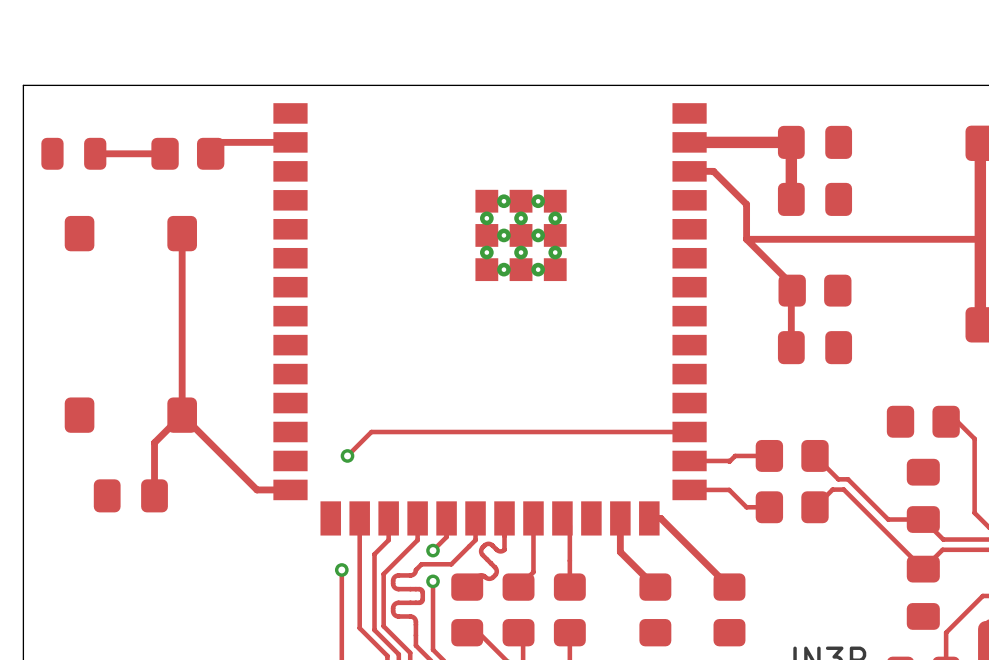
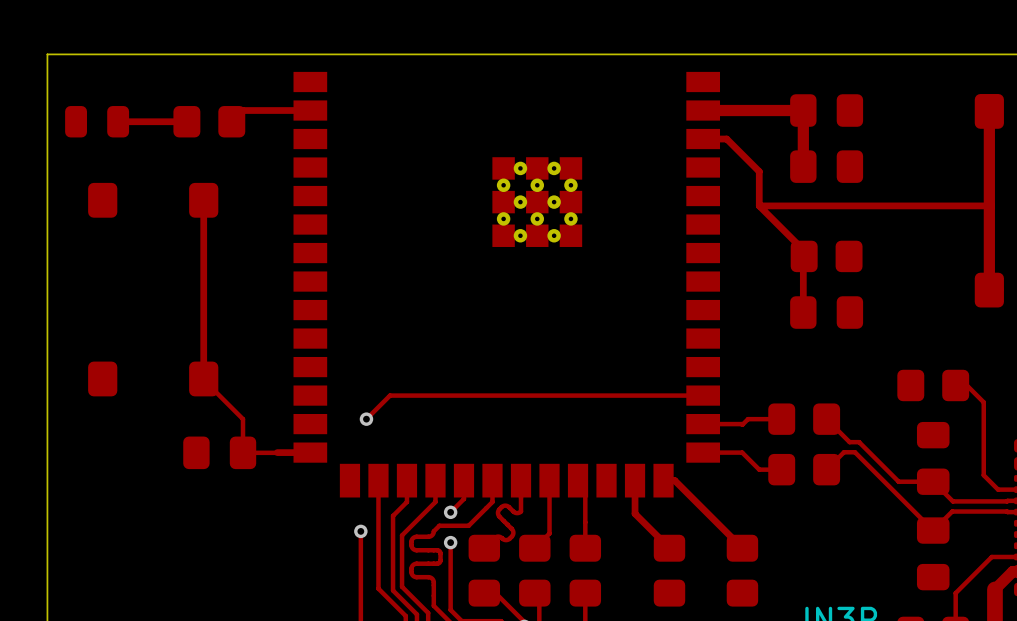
top track: (256, 489) (182, 415) (154, 442) (154, 495) -> (277, 452) (243, 452) (243, 419) (203, 378)
part position: (130, 495) -> (219, 452)

